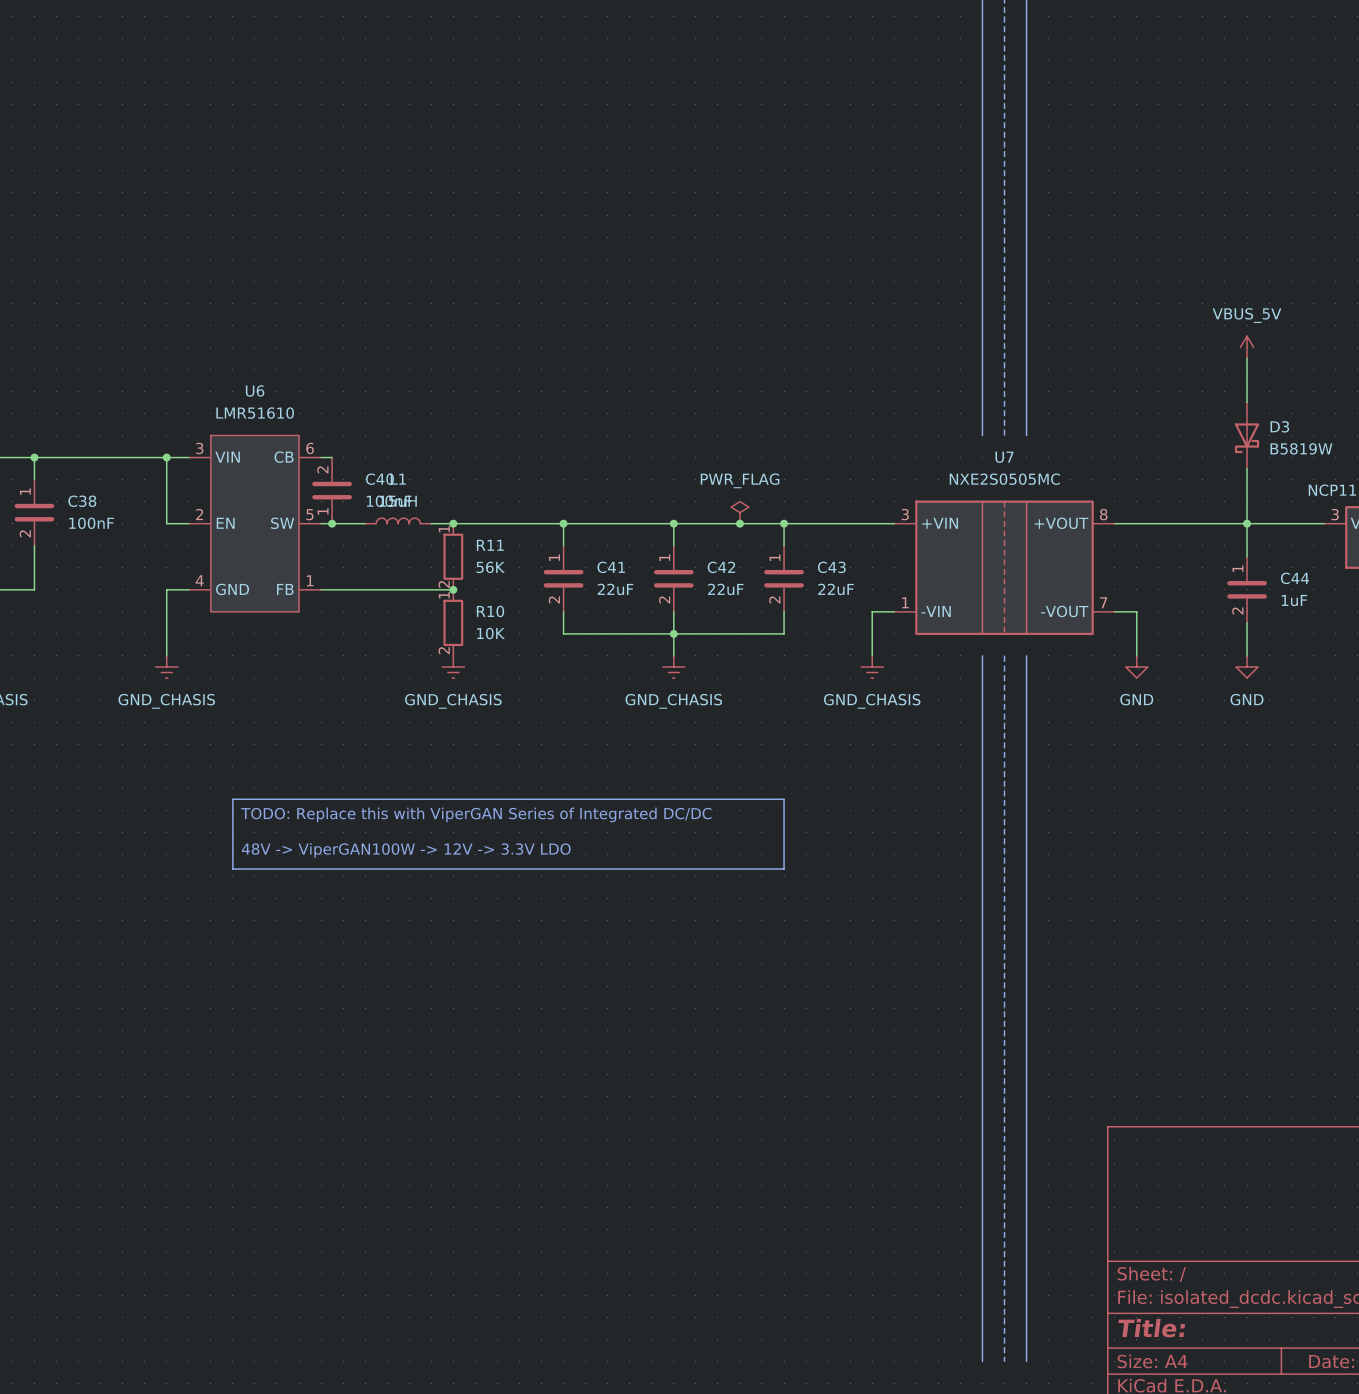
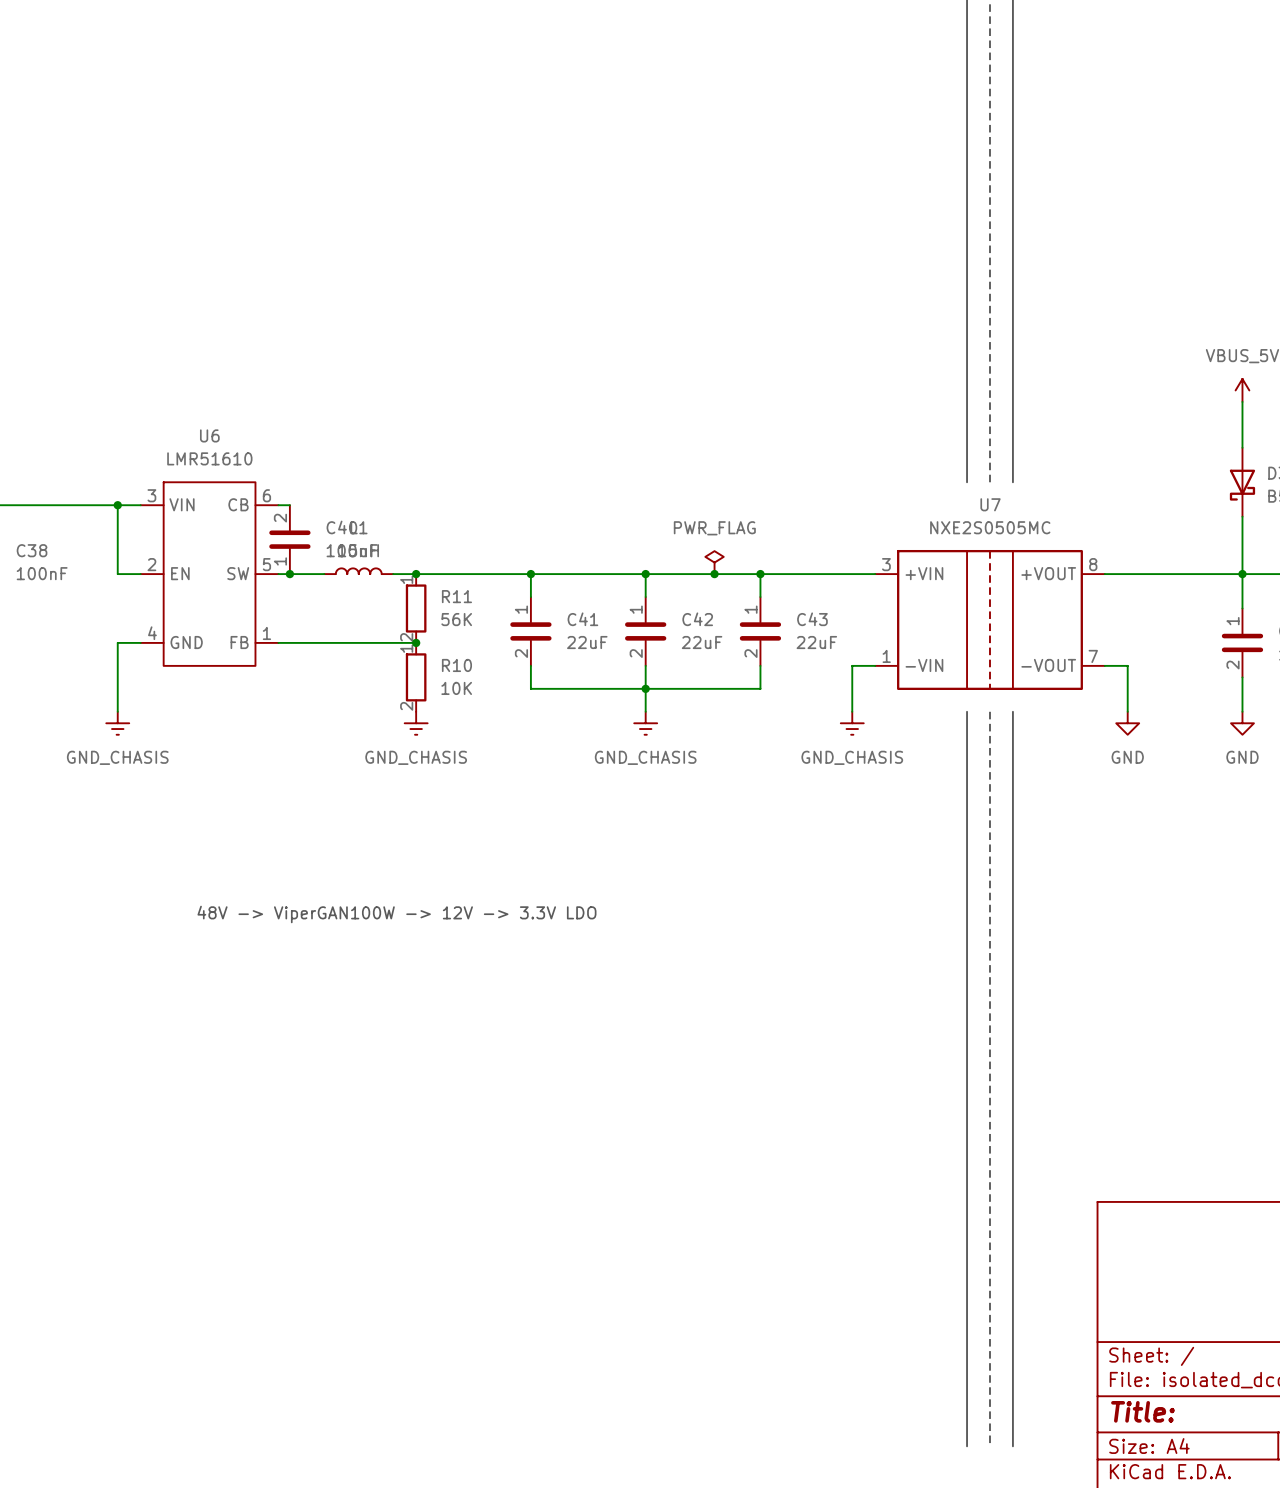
line: (232, 799) (784, 799) (784, 869) (232, 869) (232, 799) -> none
text: TODO: Replace this with ViperGAN Series of Integrated DC/DC (476, 814) -> none

